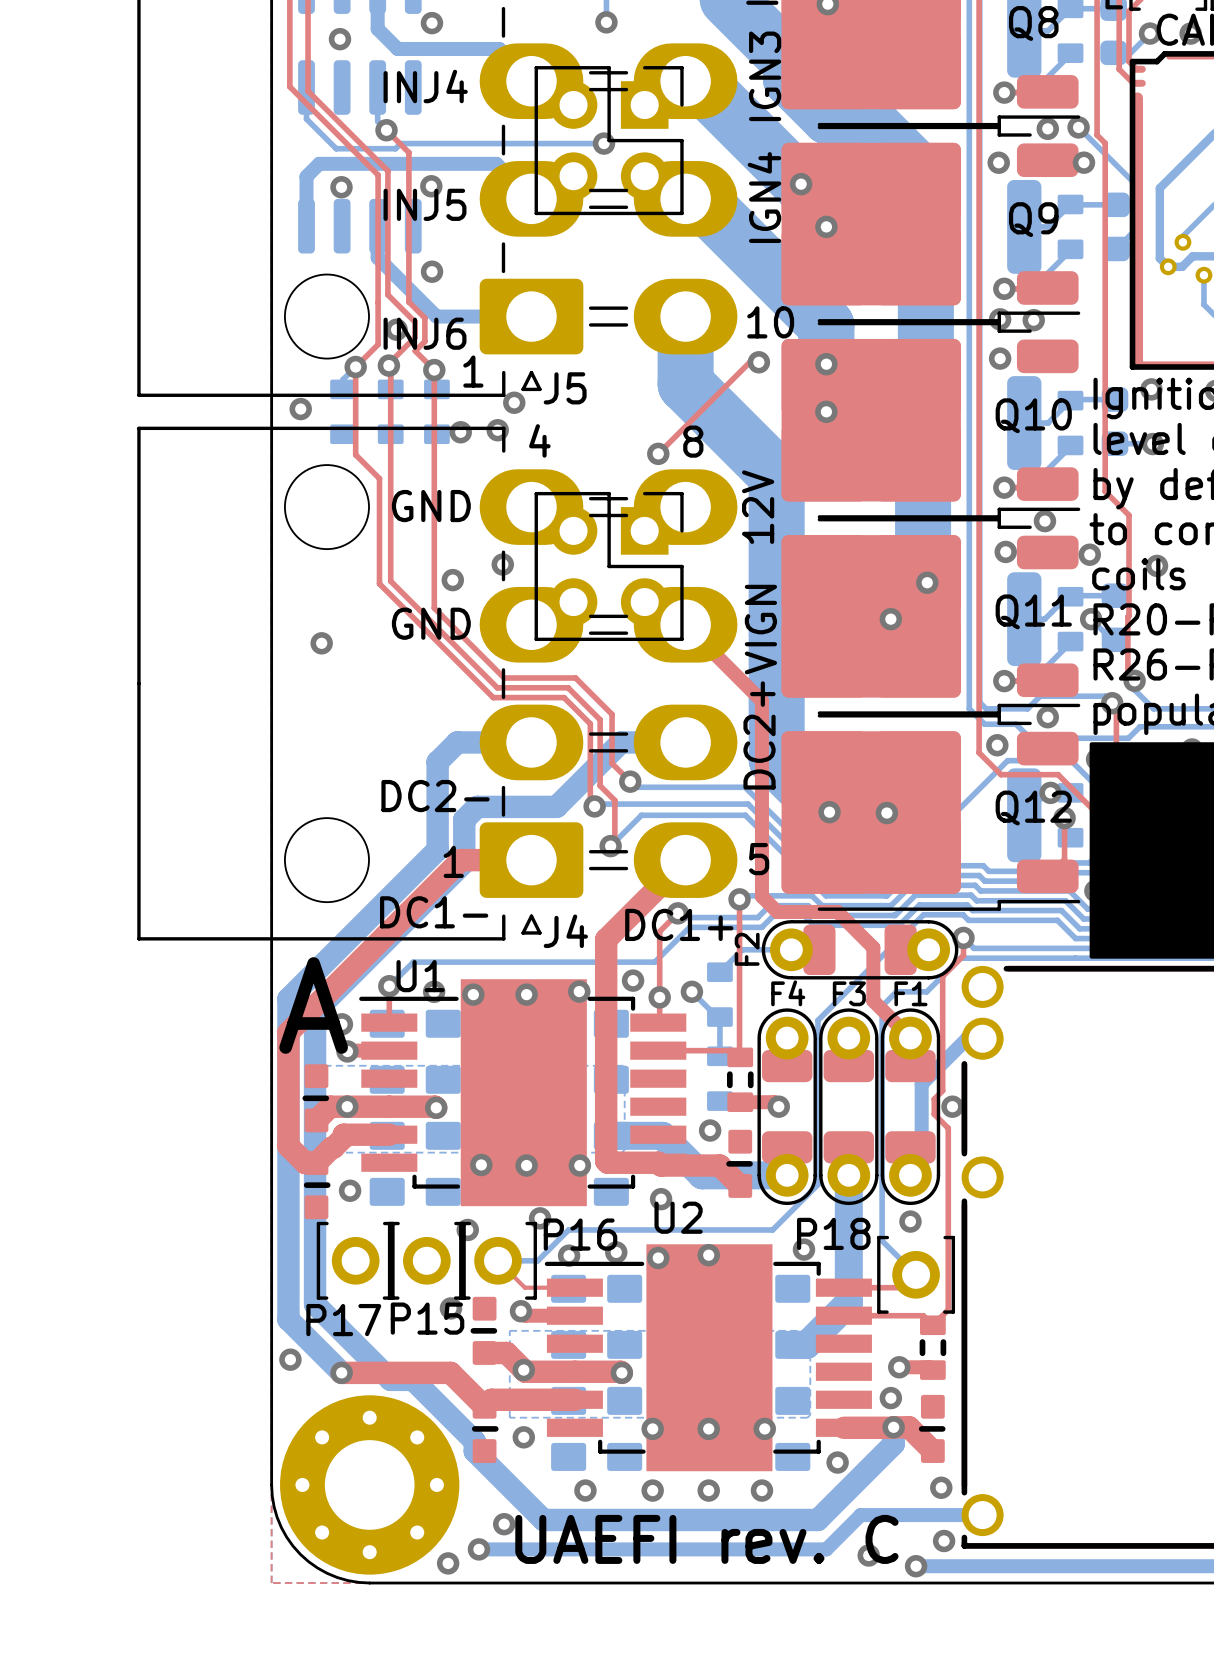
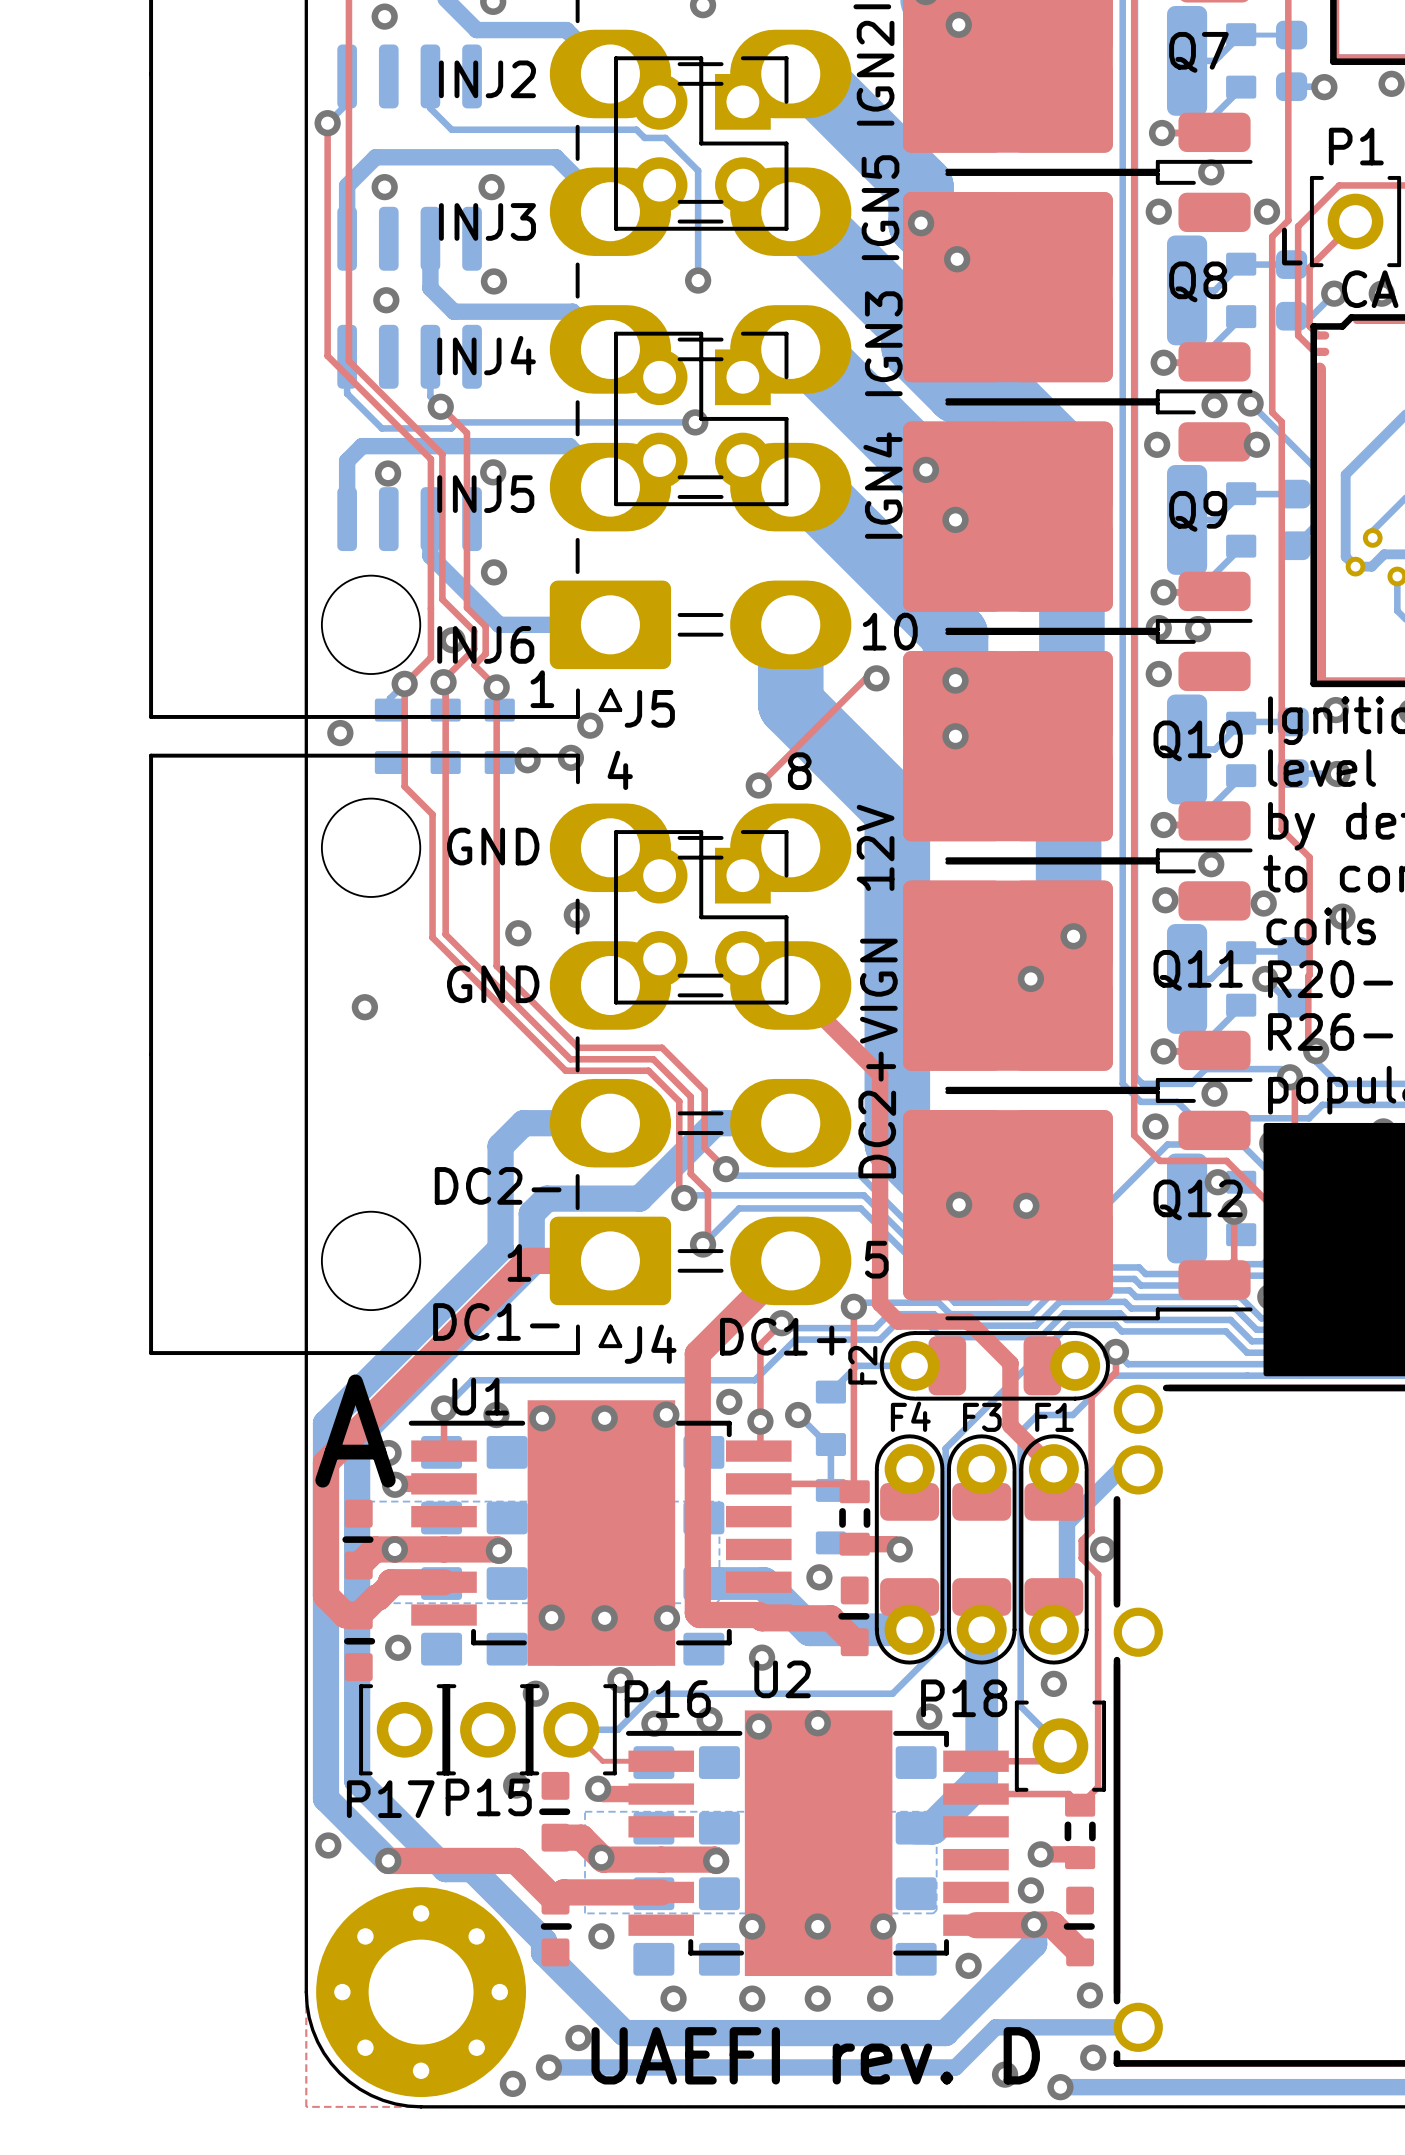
text: UAEFI rev. C (706, 1539) -> UAEFI rev. D (815, 2055)

